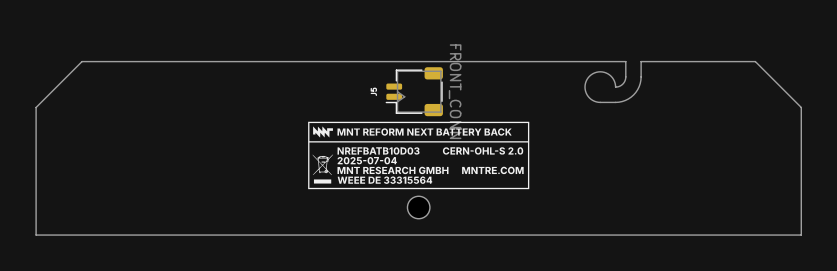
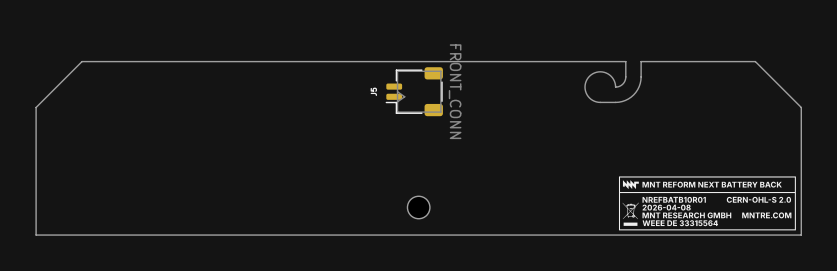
drawing: [308, 121, 530, 190] -> none
drawing: none -> [618, 176, 796, 231]

